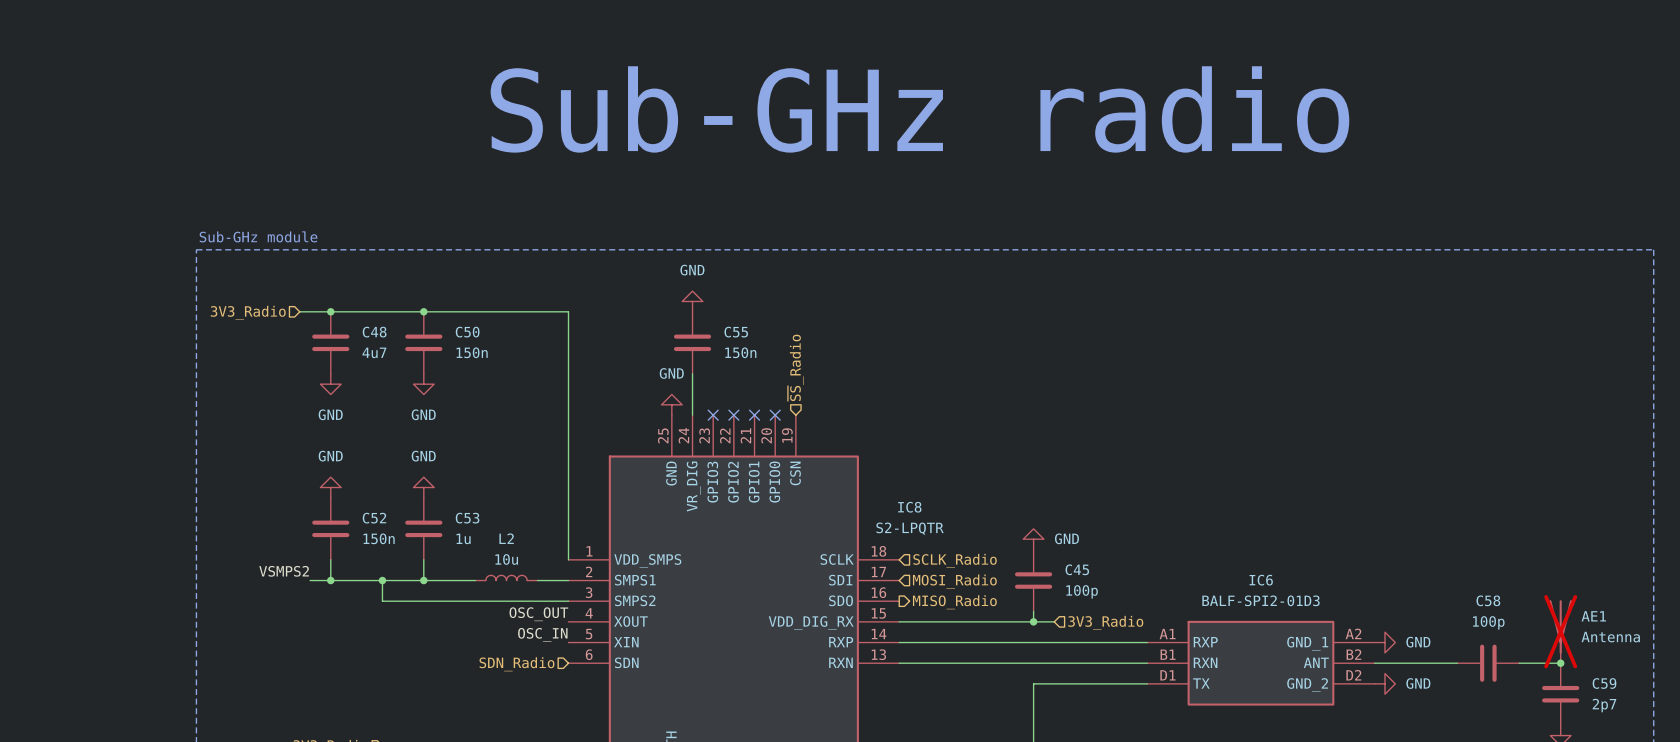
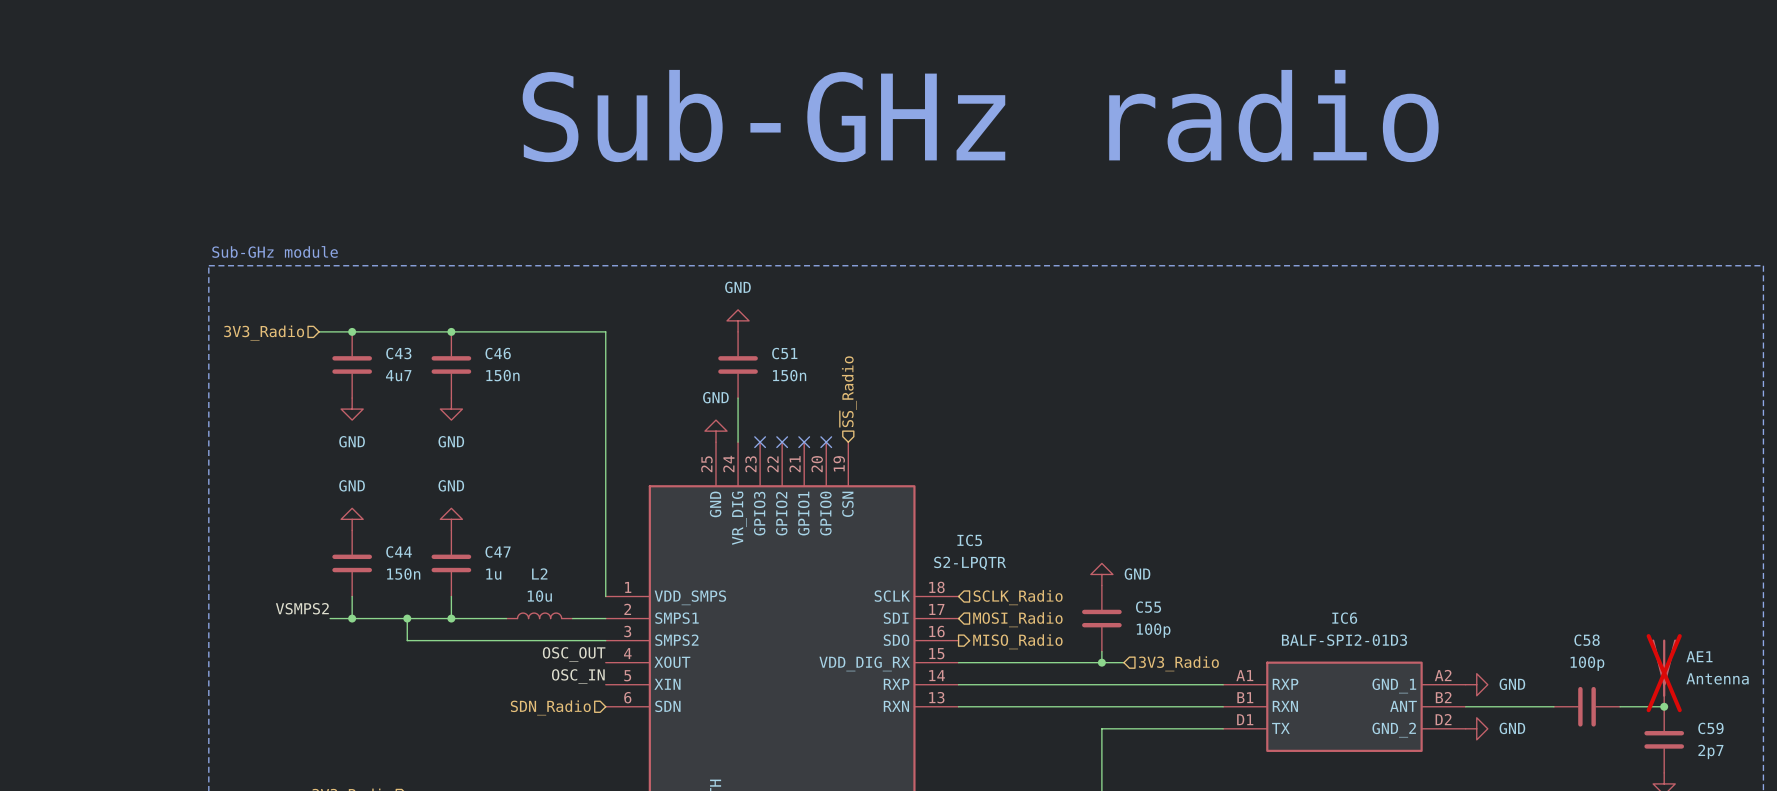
C48 name: C48 (374, 332) -> C43 (398, 353)
C50 name: C50 (467, 332) -> C46 (498, 353)
C55 name: C55 (736, 332) -> C51 (784, 353)
IC8 name: IC8 (909, 507) -> IC5 (969, 540)
C52 name: C52 (374, 518) -> C44 (399, 552)
C53 name: C53 (467, 518) -> C47 (498, 552)
C45 name: C45 (1077, 569) -> C55 (1148, 607)

